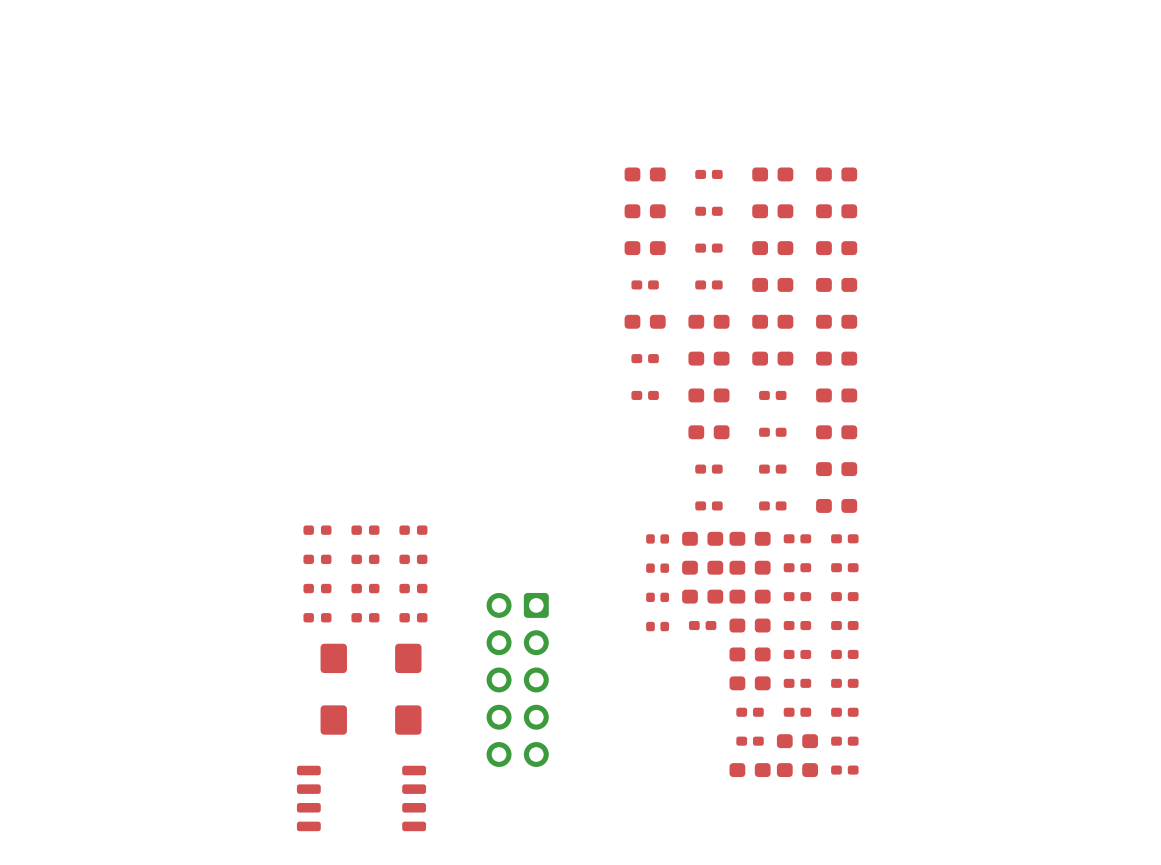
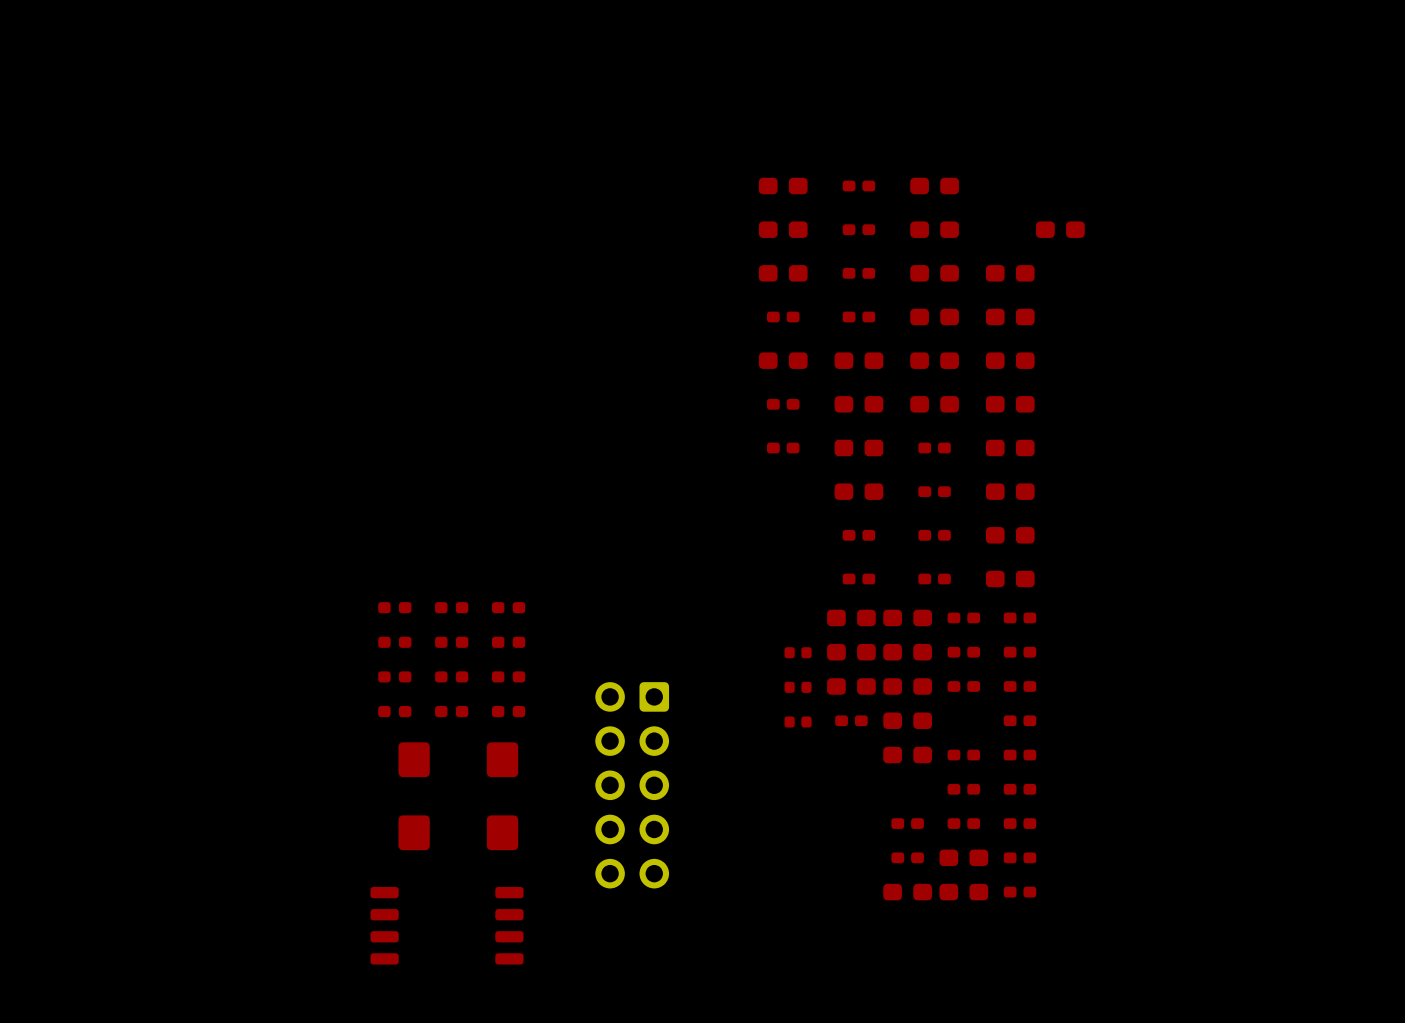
part: (836, 174) -> none
part: (836, 211) -> none
part: none -> (1060, 229)
part: (657, 538) -> none
part: (797, 625) -> none
part: (750, 683) -> none

